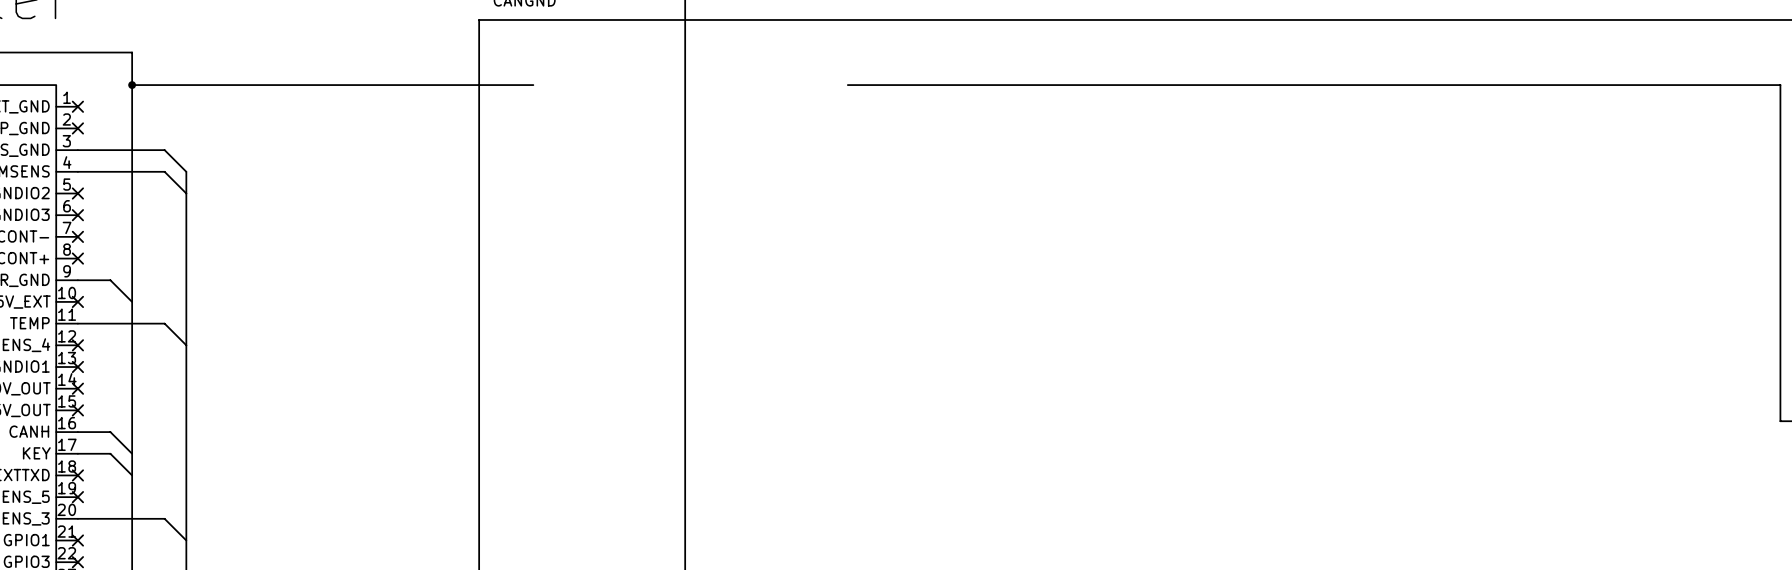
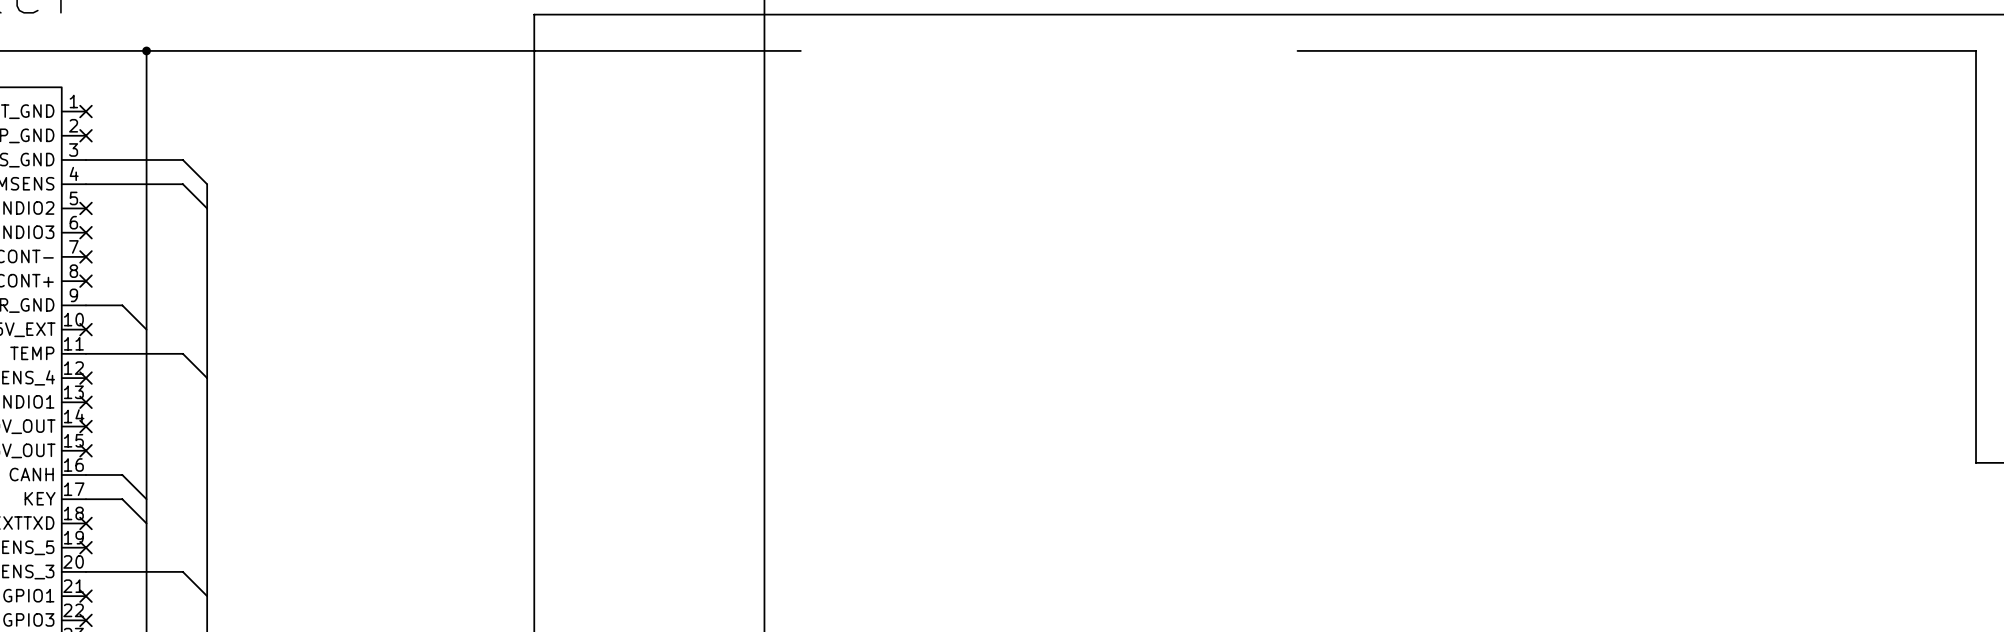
bus: none -> (146, 50) (800, 50)
bus: (132, 85) (533, 85) -> none
junction position: (132, 85) -> (146, 50)
bus: (847, 85) (1780, 85) (1780, 421) -> (1297, 50) (1976, 50) (1976, 462) (1988, 462)

